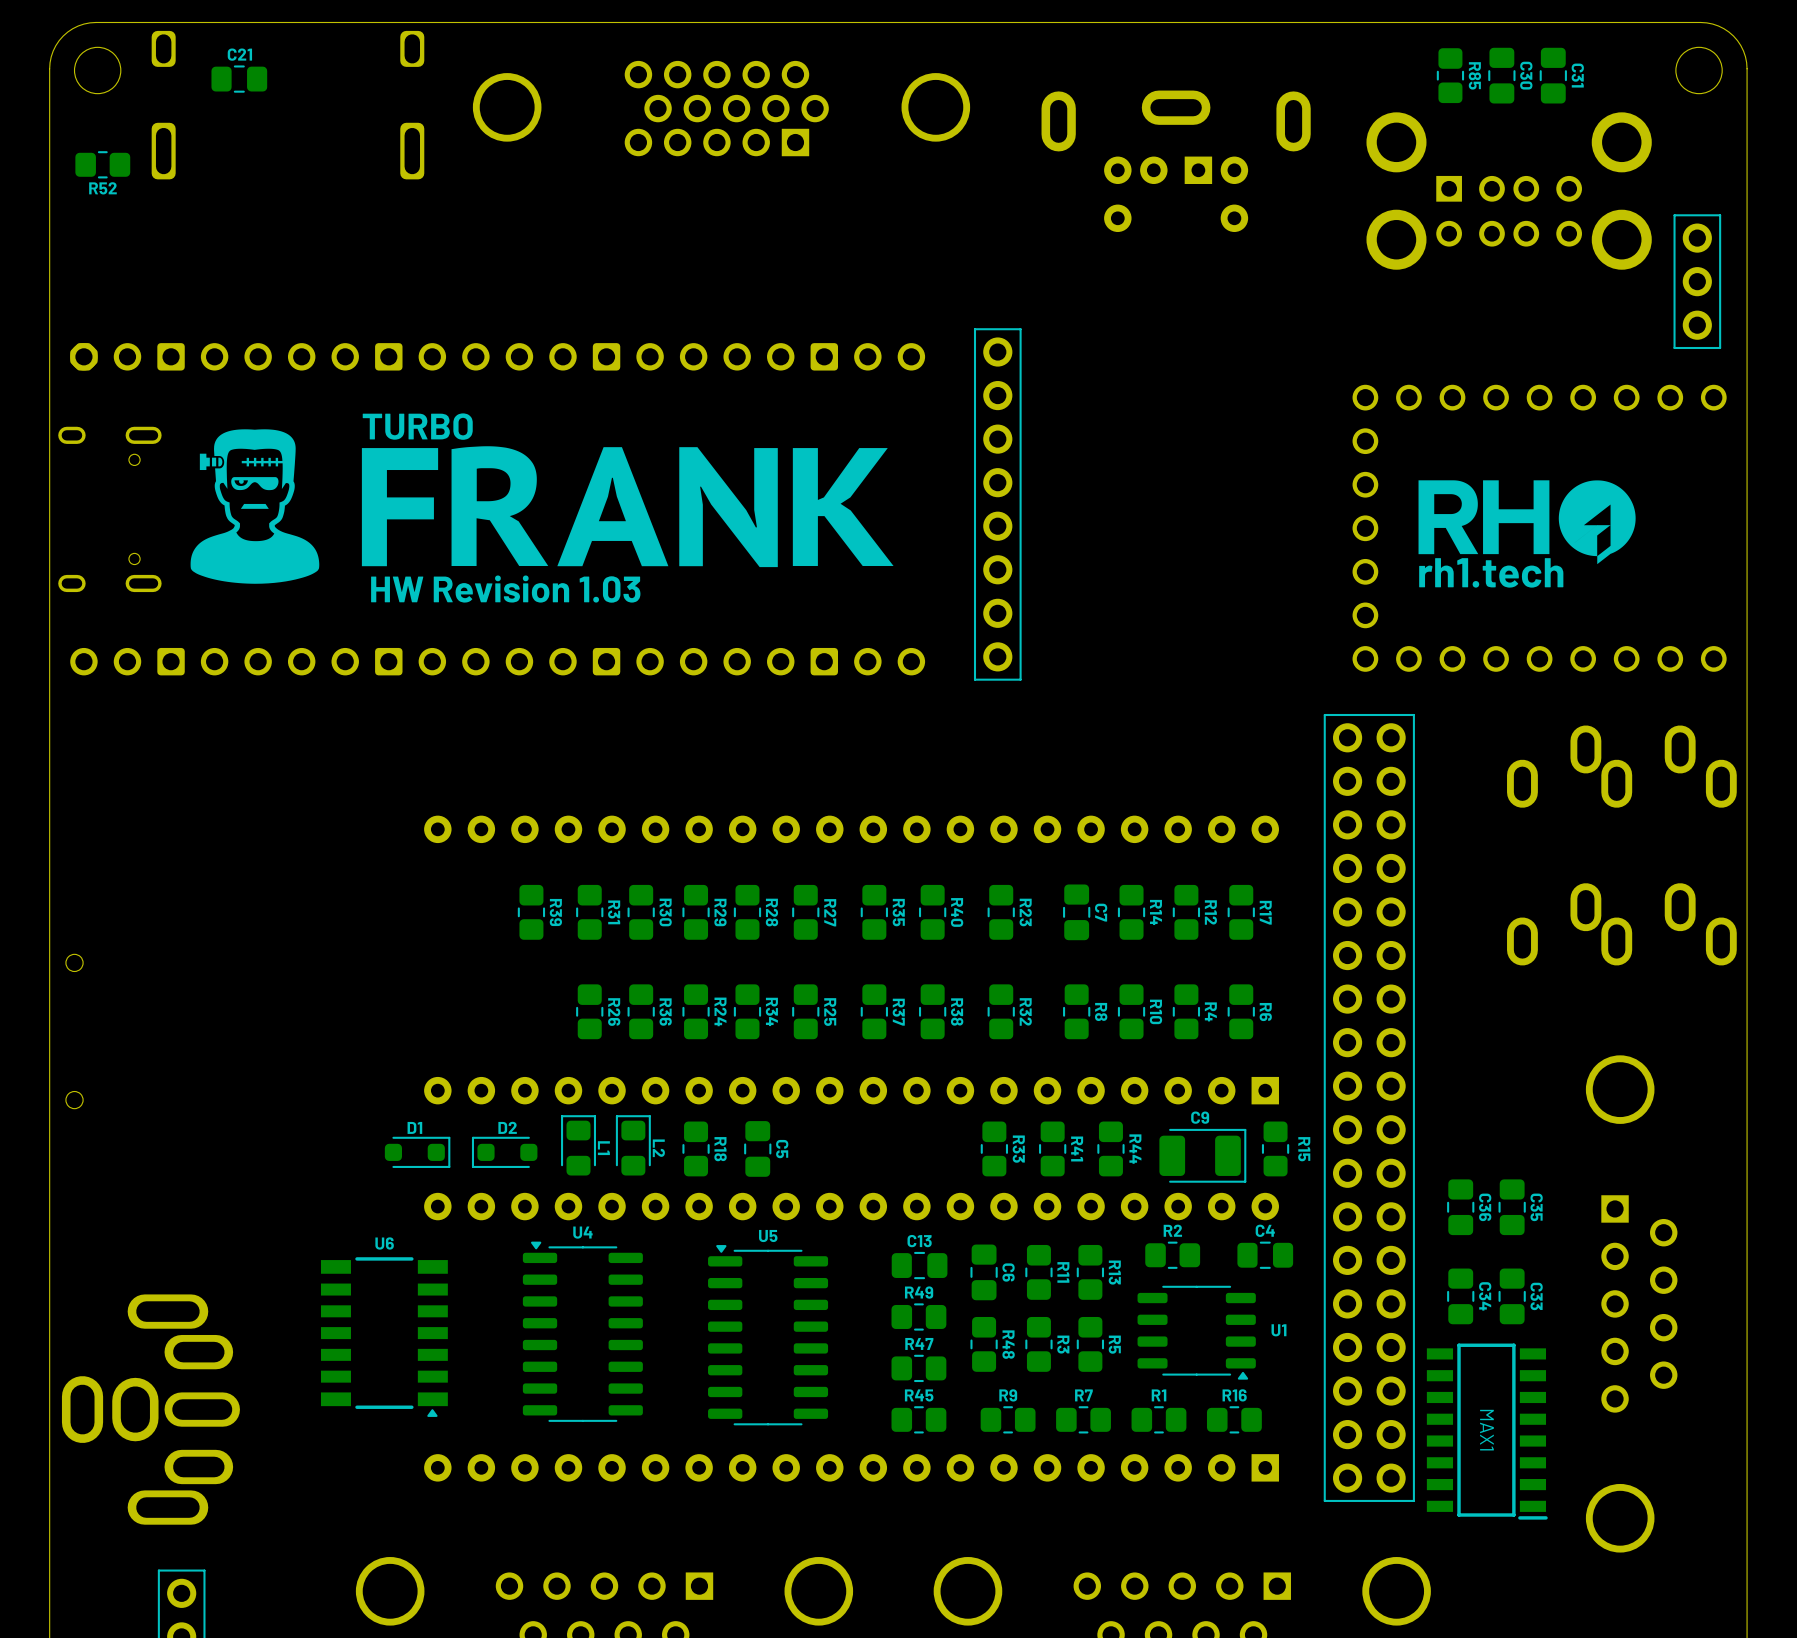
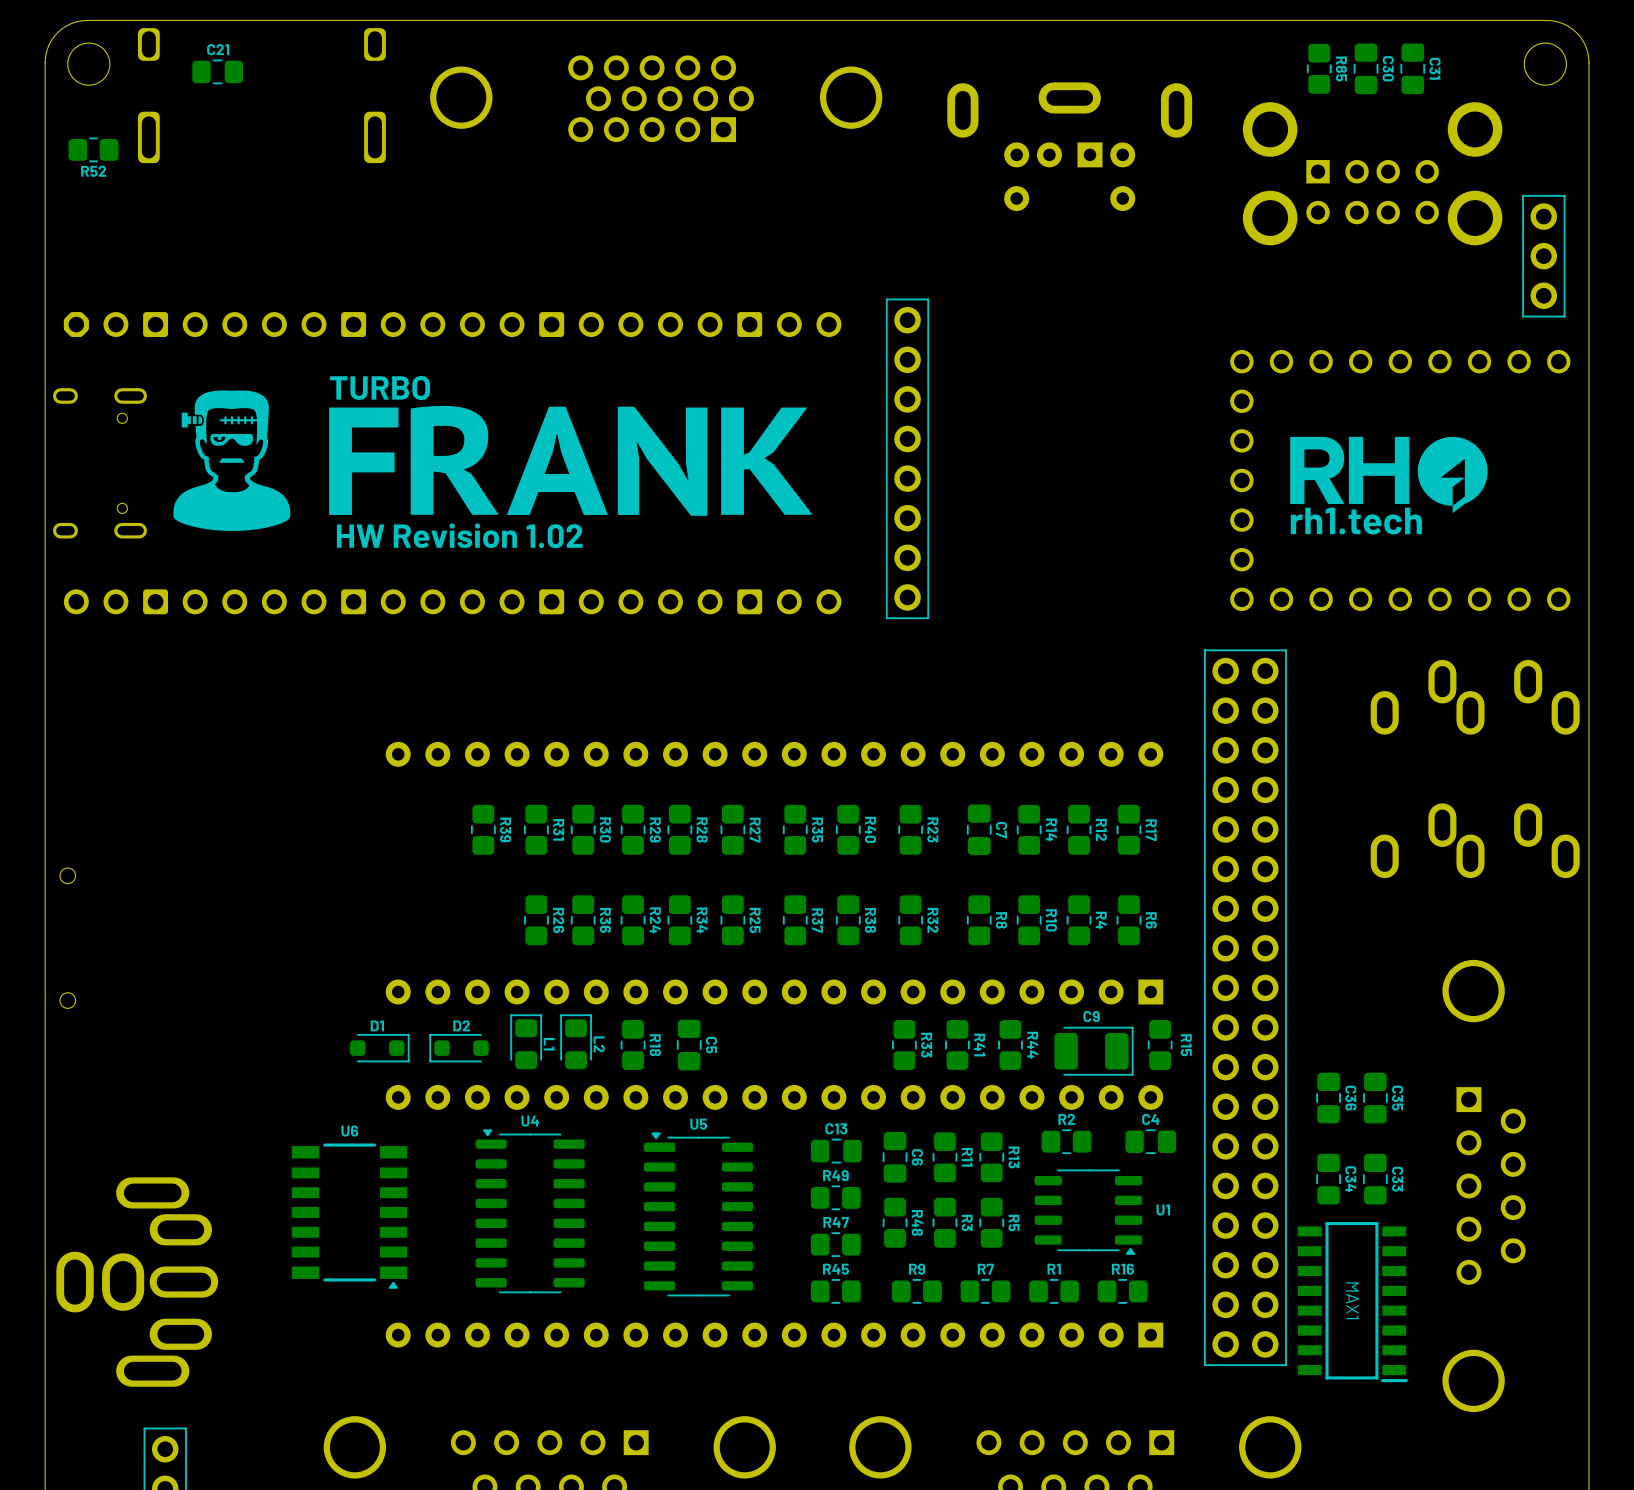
text: HW Revision 1.03 (505, 589) -> HW Revision 1.02 (459, 535)

